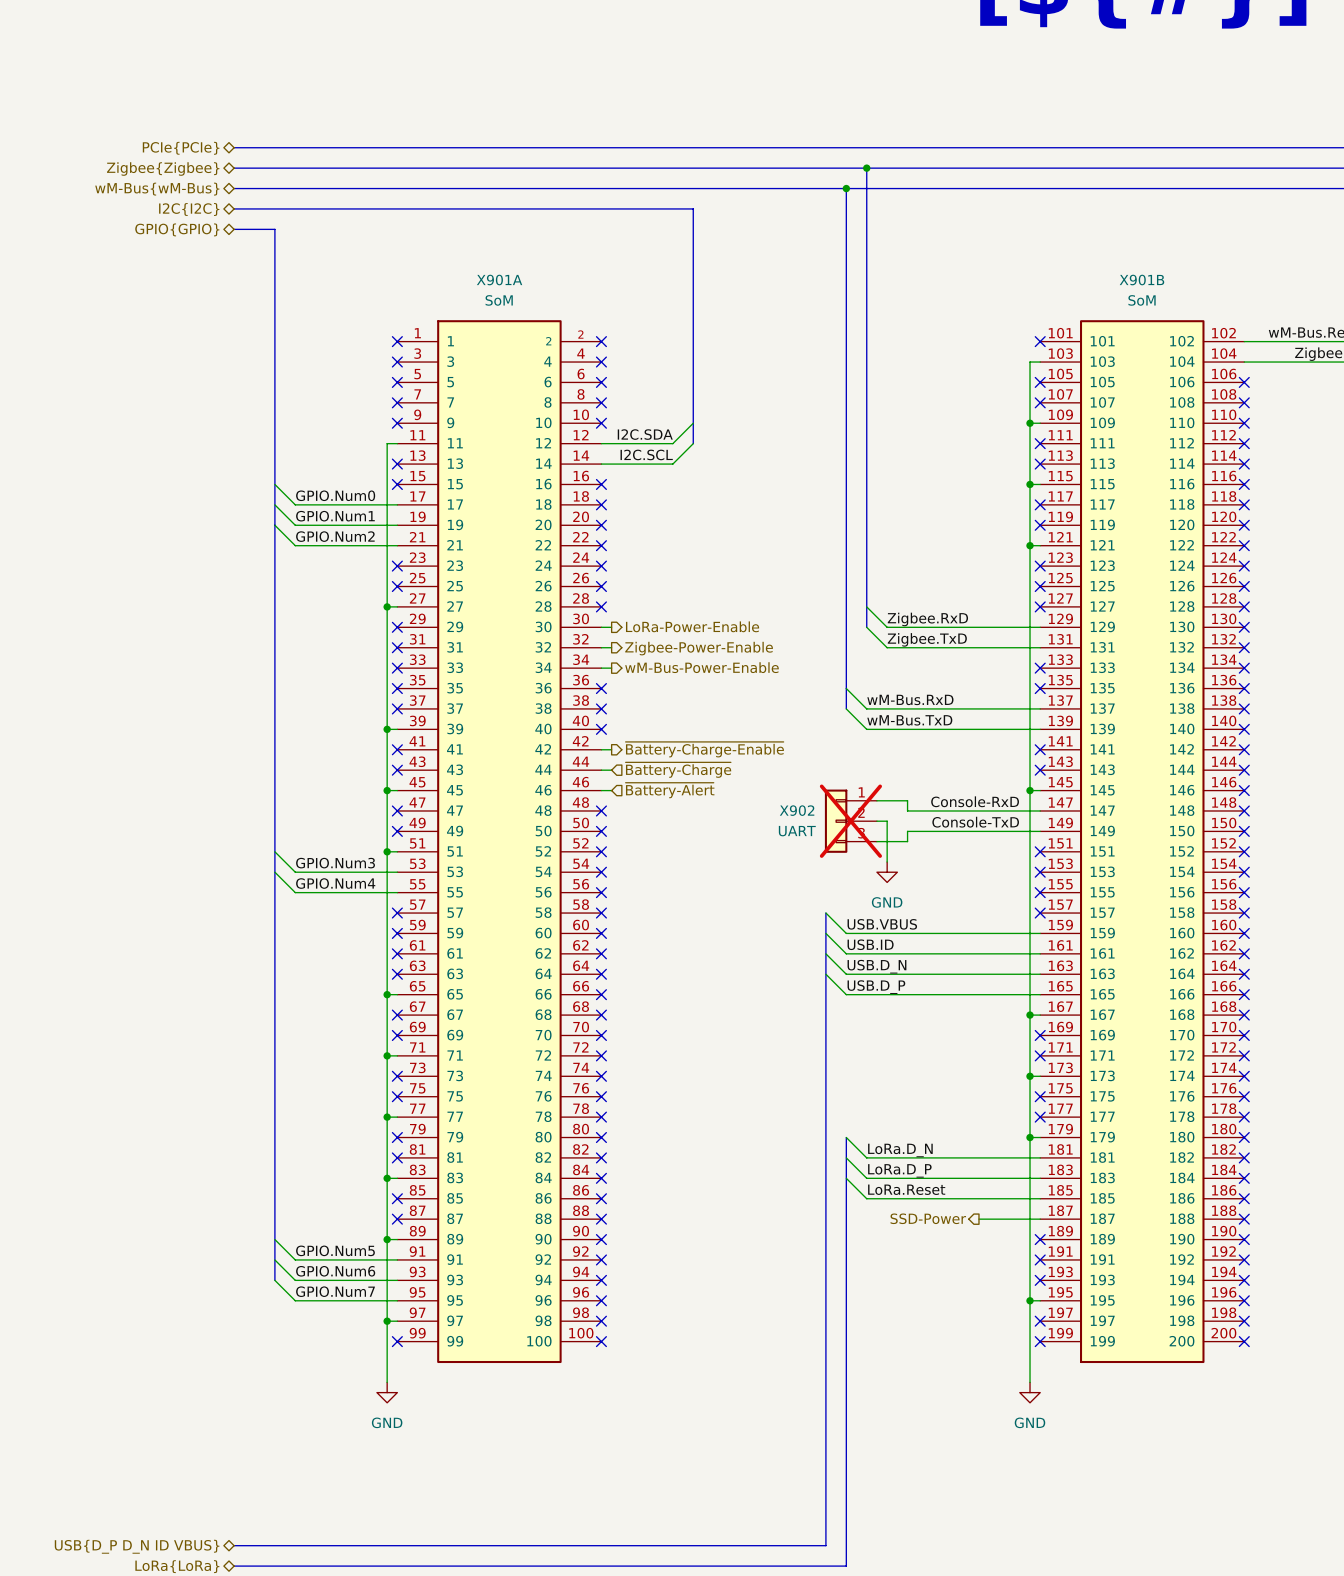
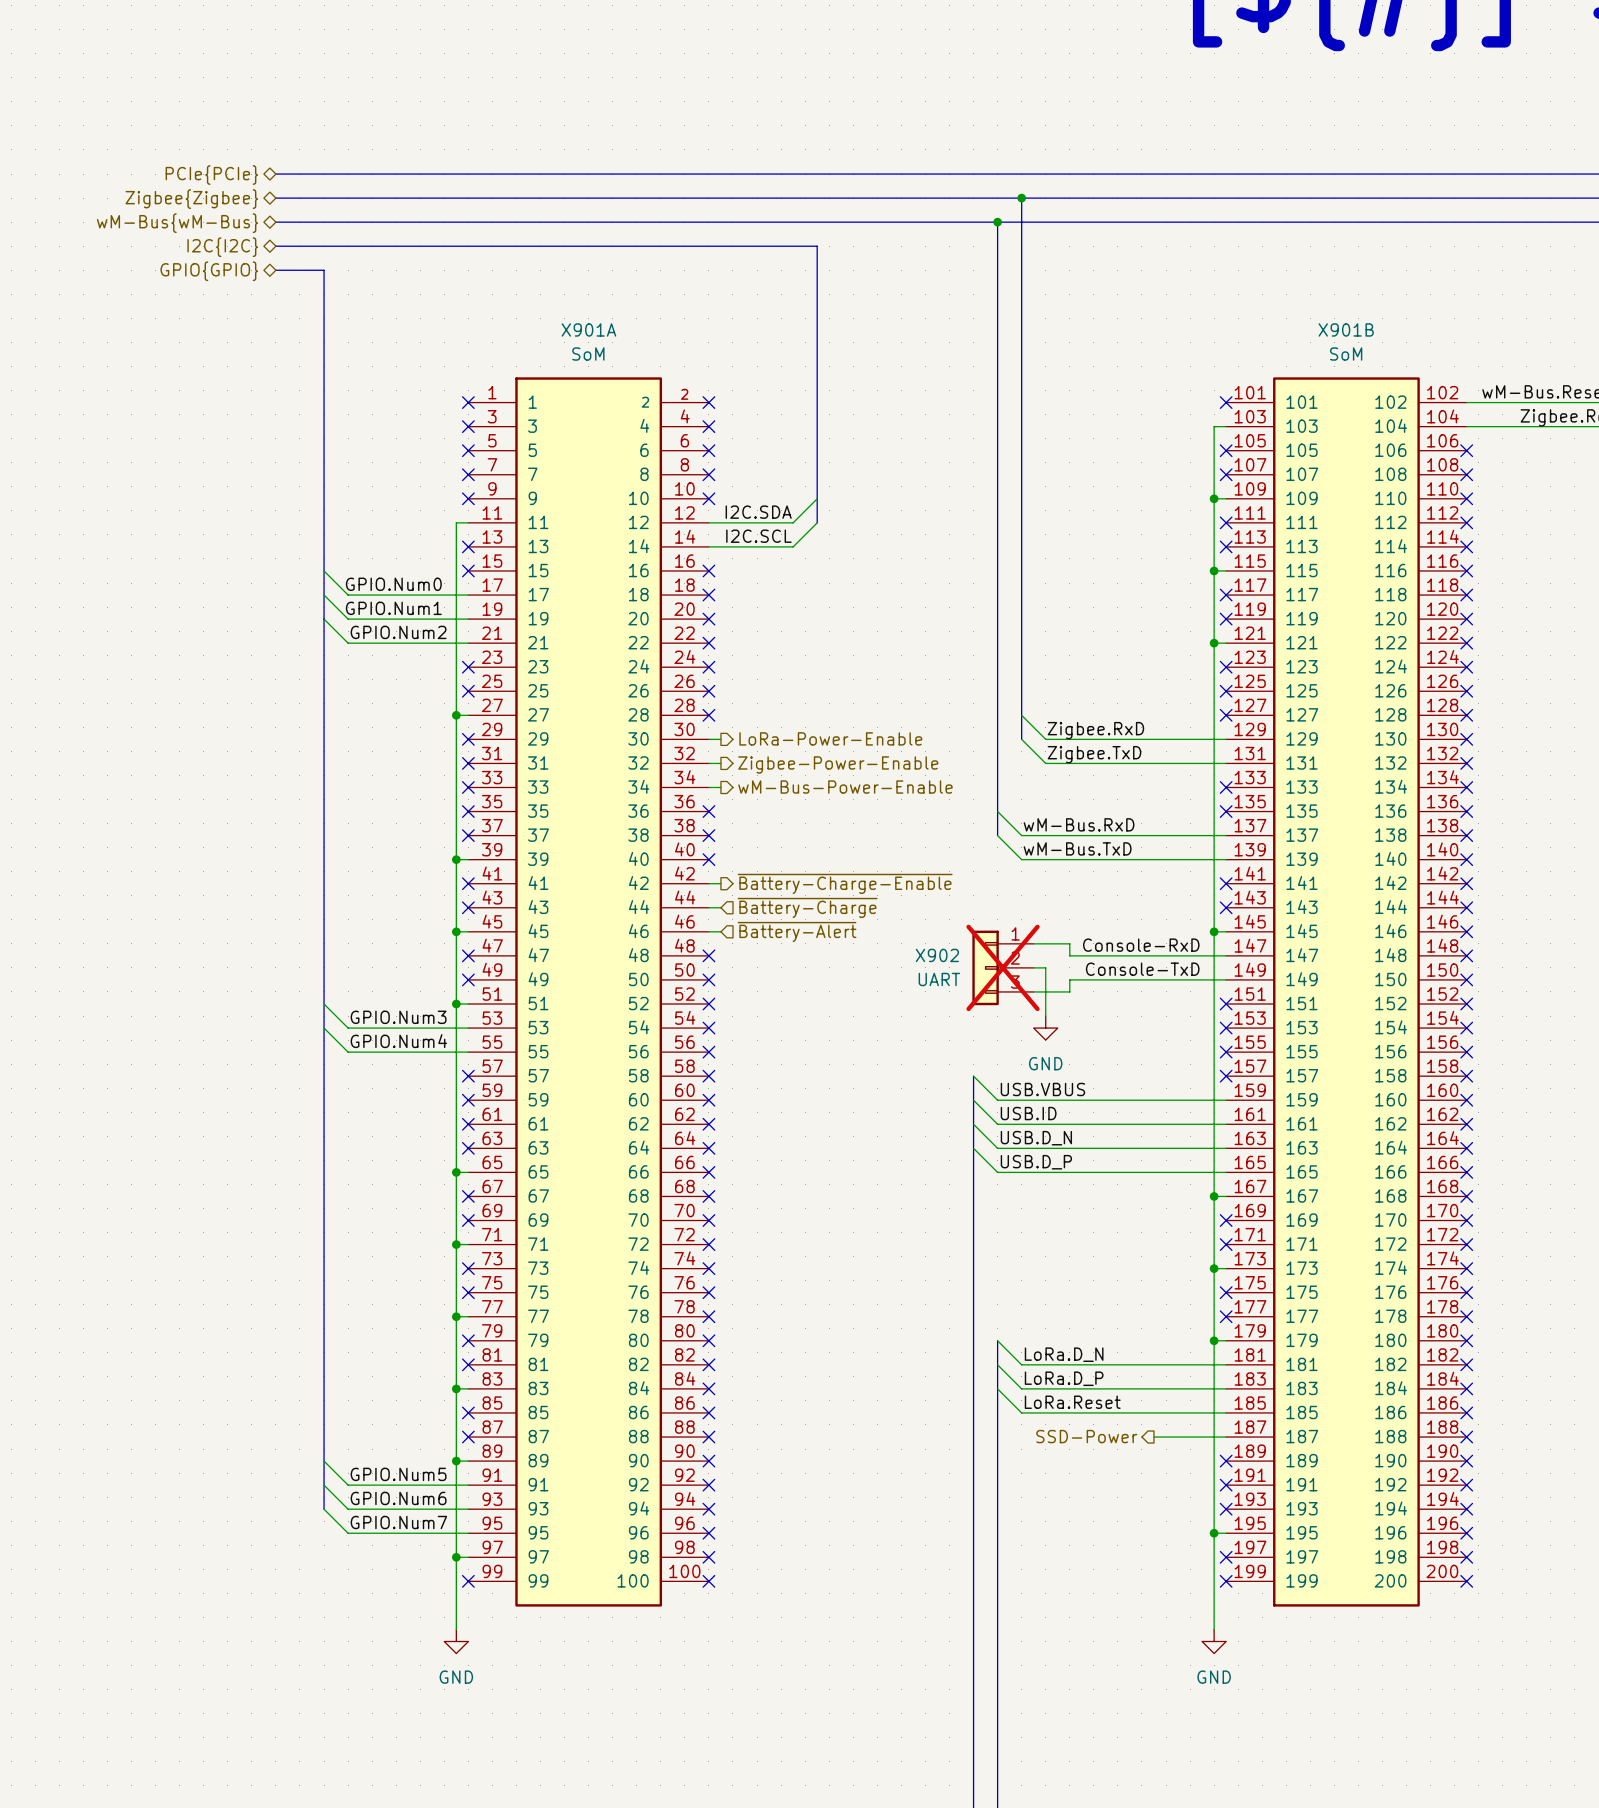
label position: GPIO.Num0 (335, 495) -> GPIO.Num0 (393, 584)
label position: GPIO.Num1 (335, 516) -> GPIO.Num1 (393, 608)

